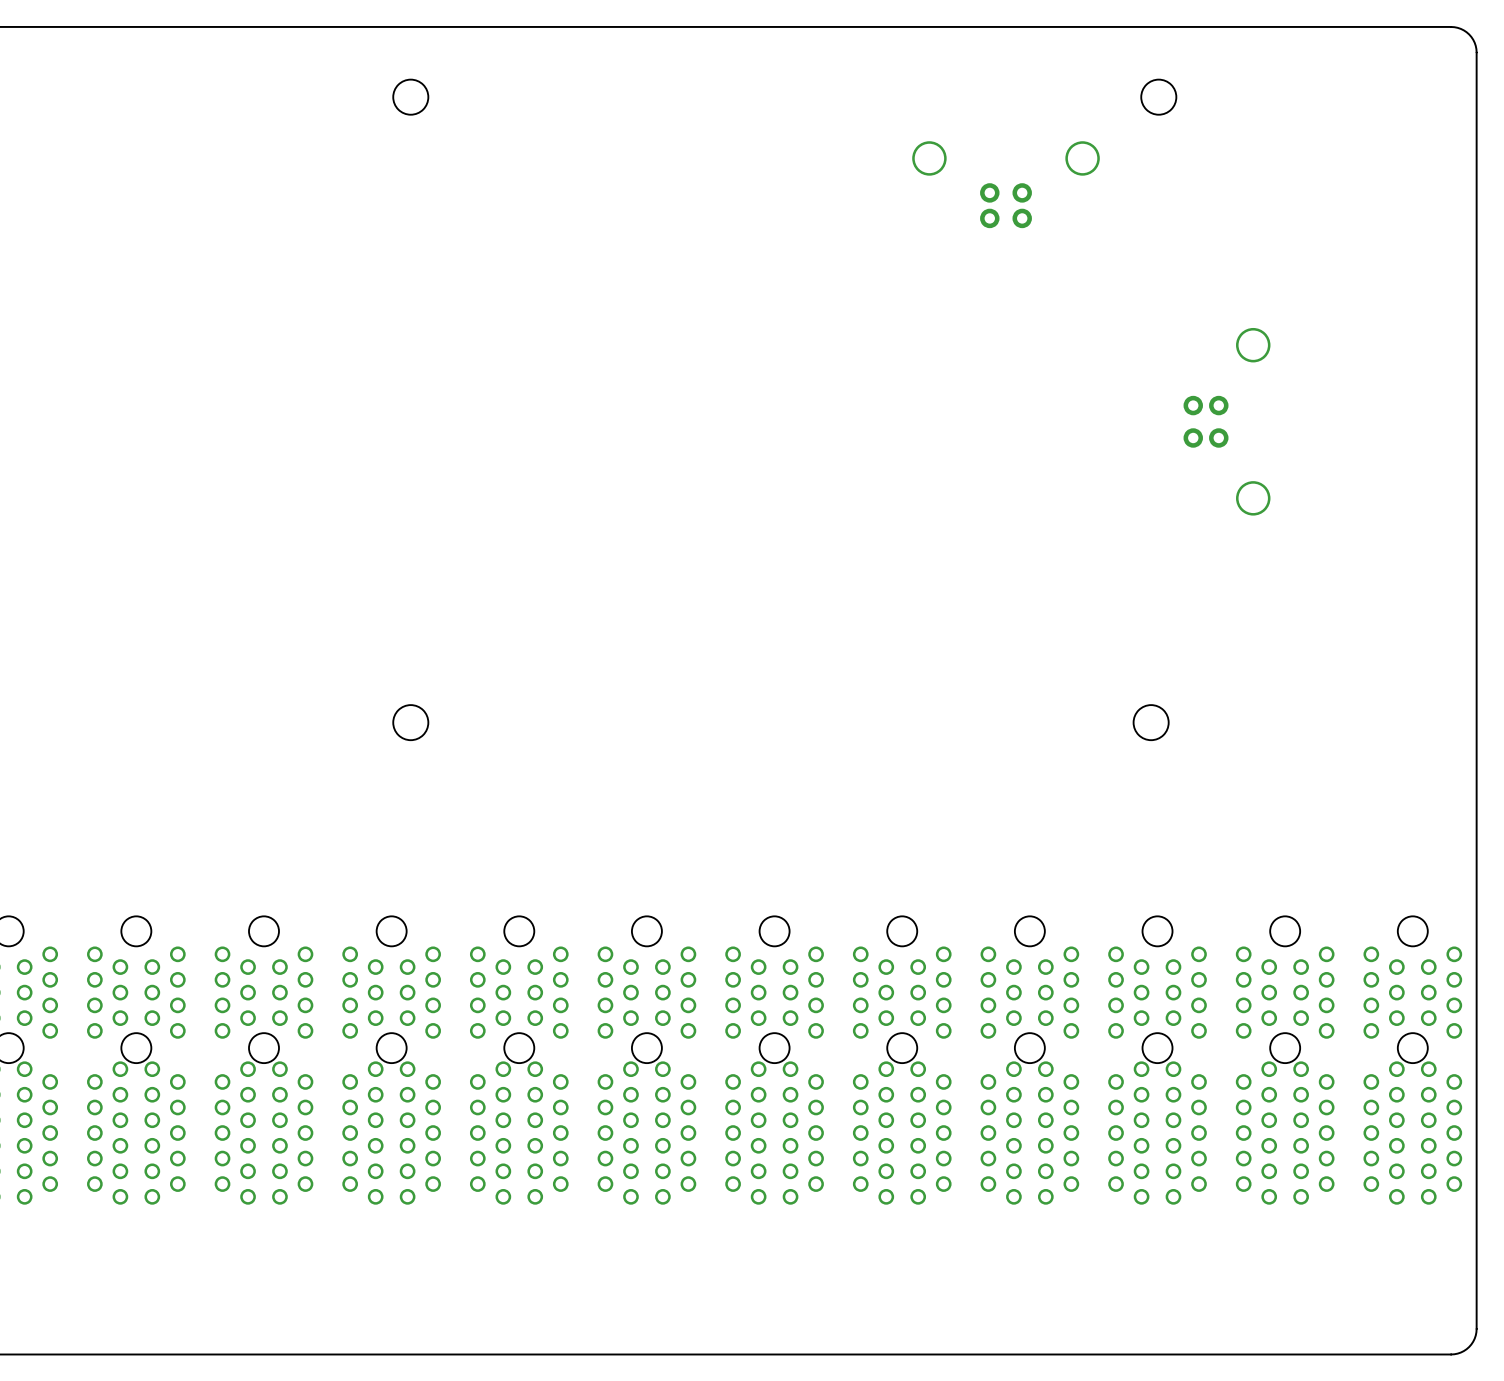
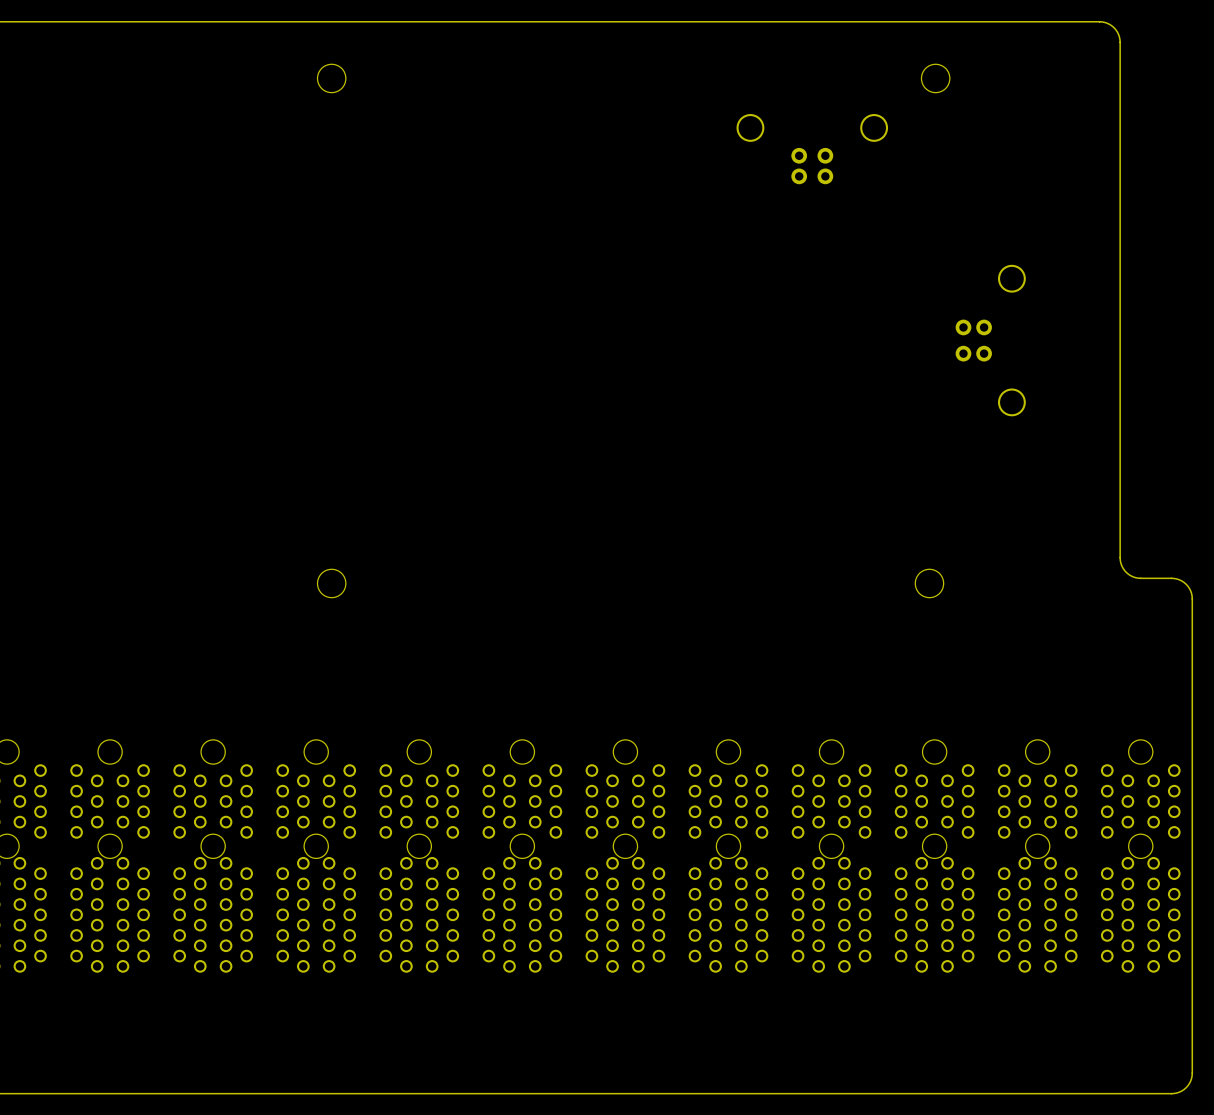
board edge: (1361, 26) (1454, 27) (1469, 34) (1476, 49) (1476, 741) -> (1099, 21) (1107, 23) (1114, 27) (1118, 34) (1120, 42) (1120, 560) (1124, 570) (1135, 577) (1174, 578) (1181, 581) (1189, 588) (1192, 598)

